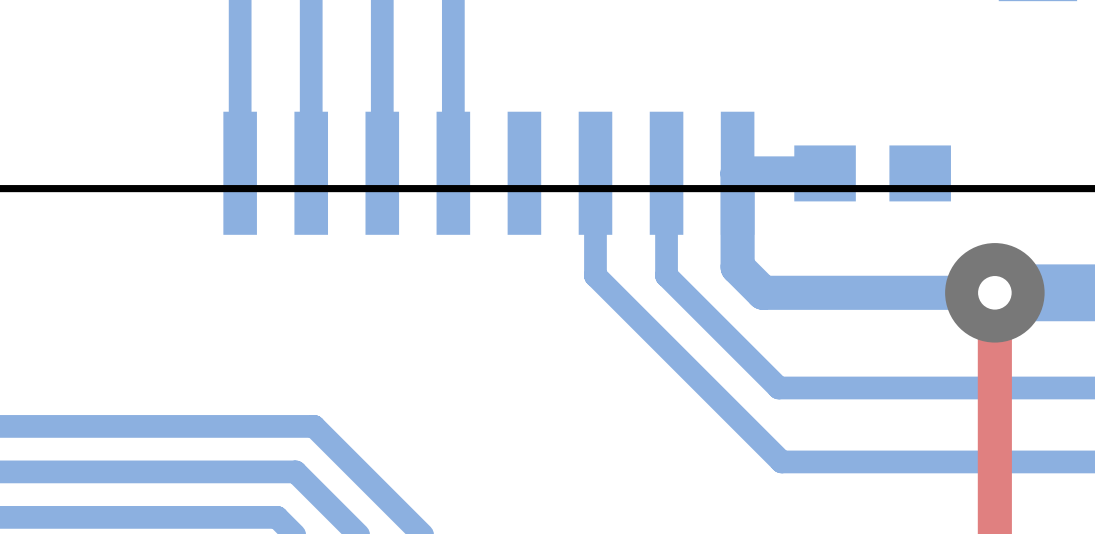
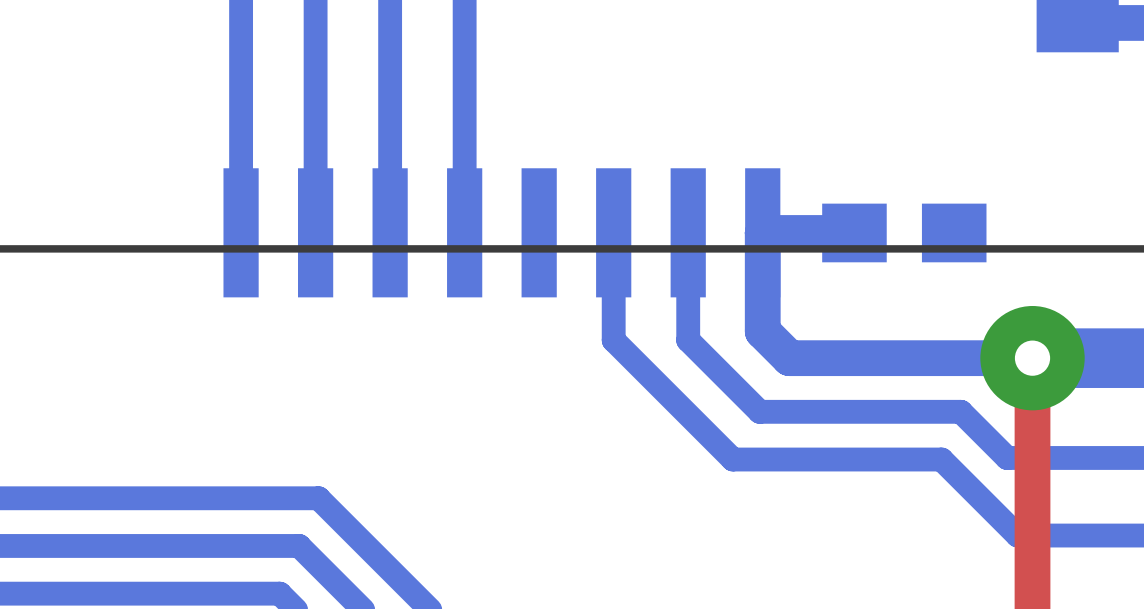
bottom track: (734, 343) (778, 387) (970, 387) -> (759, 411) (960, 411) (1007, 457)
bottom track: (709, 389) (781, 461) (980, 461) -> (732, 459) (941, 459) (1017, 535)

